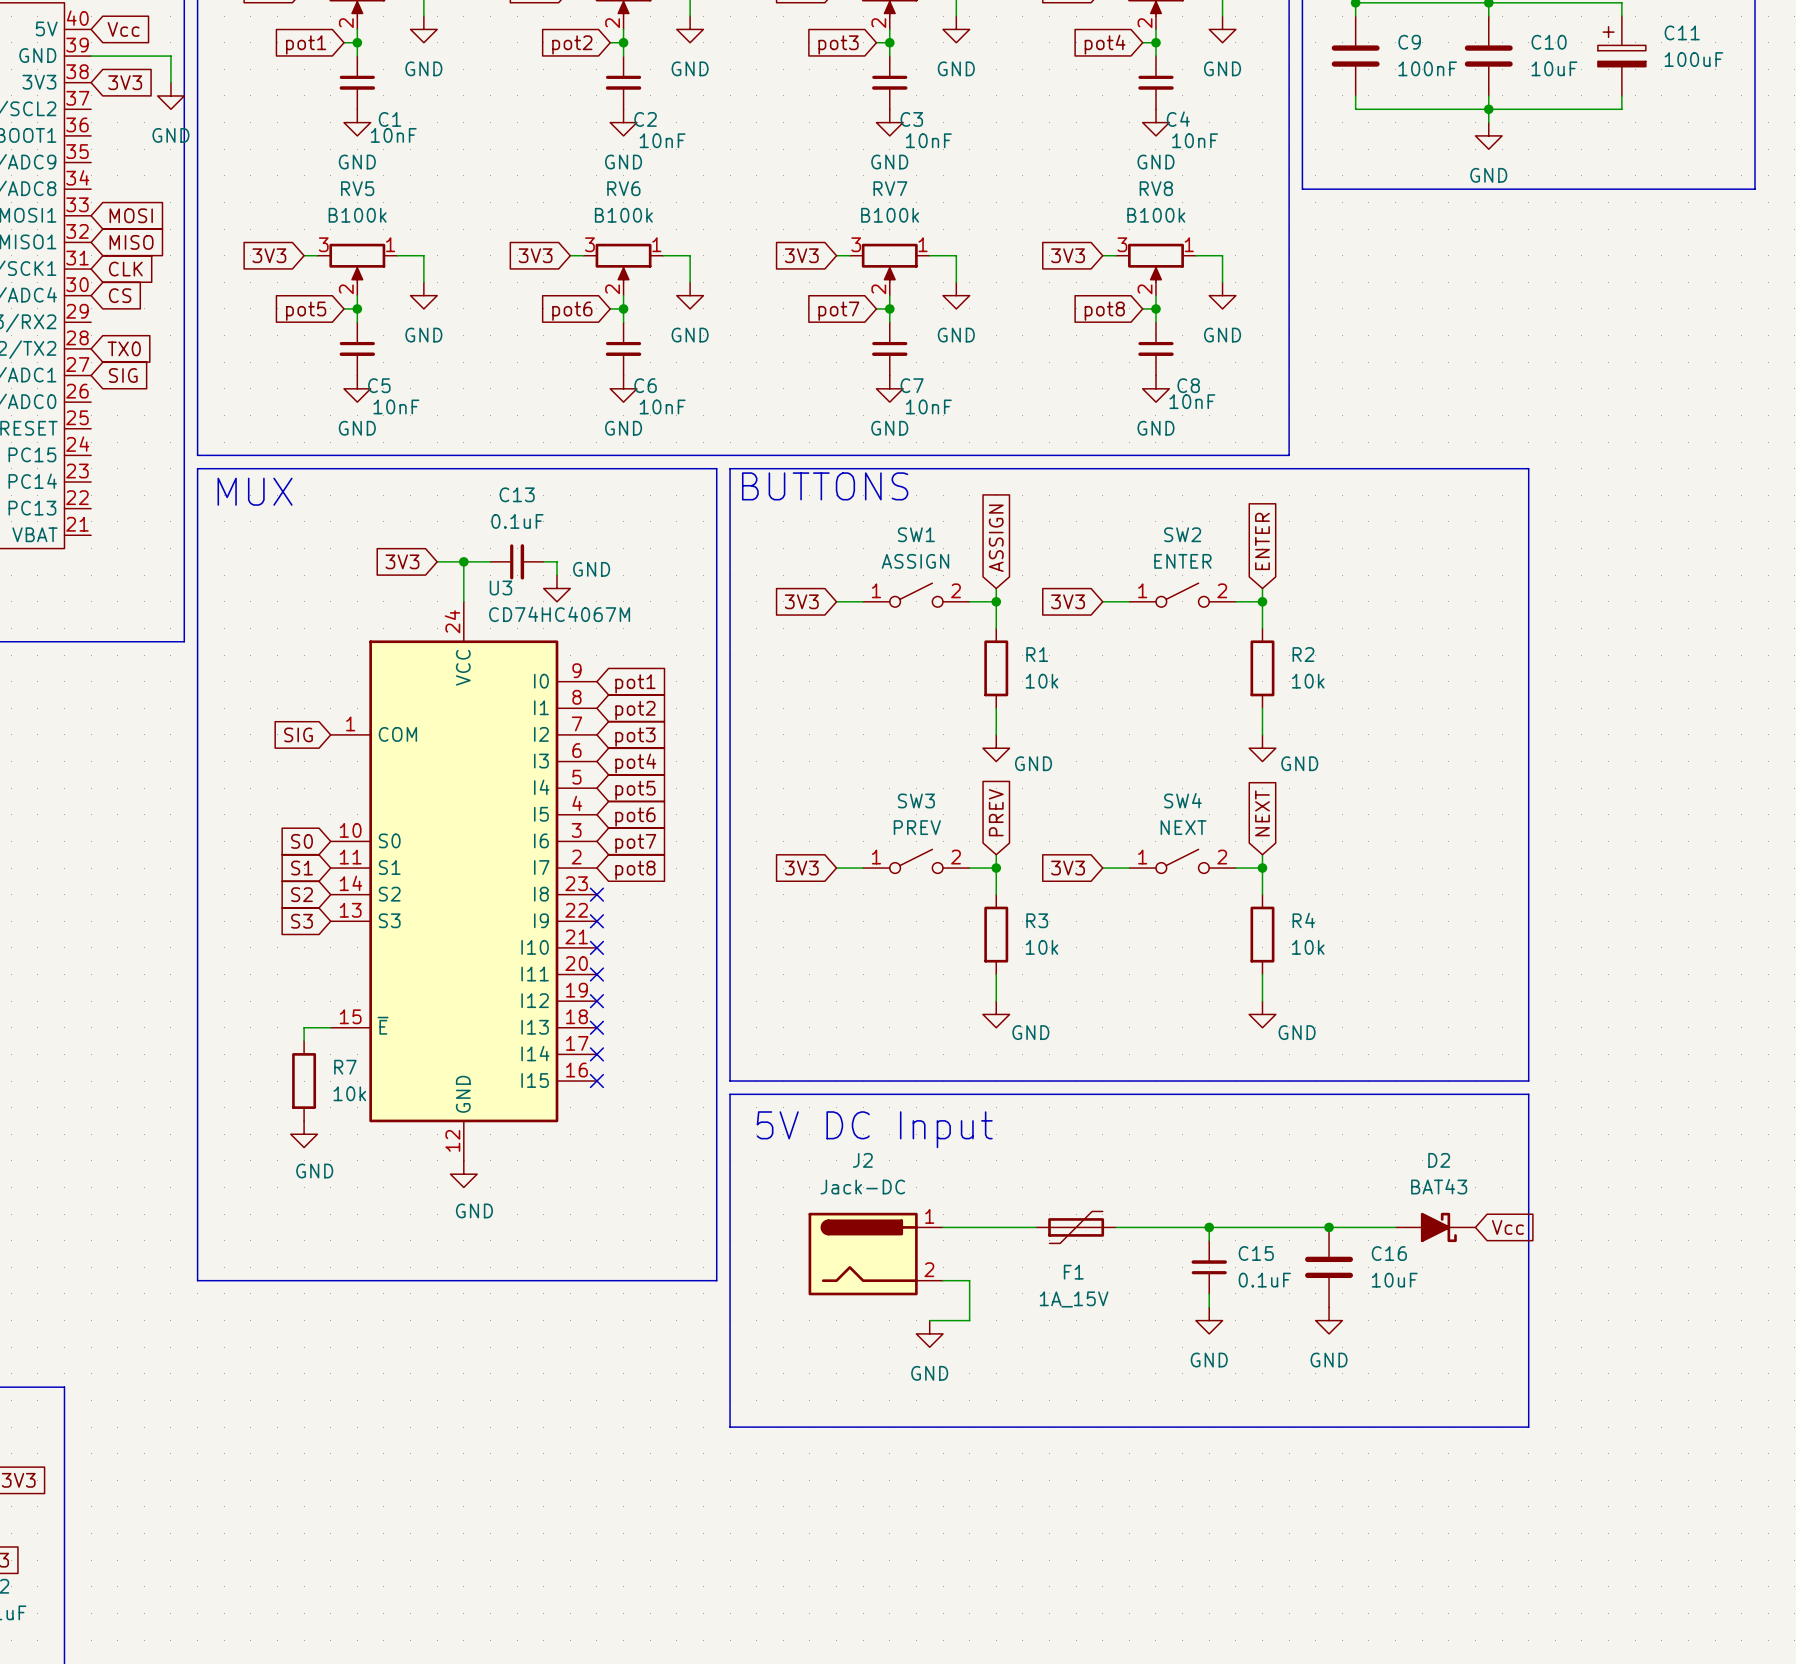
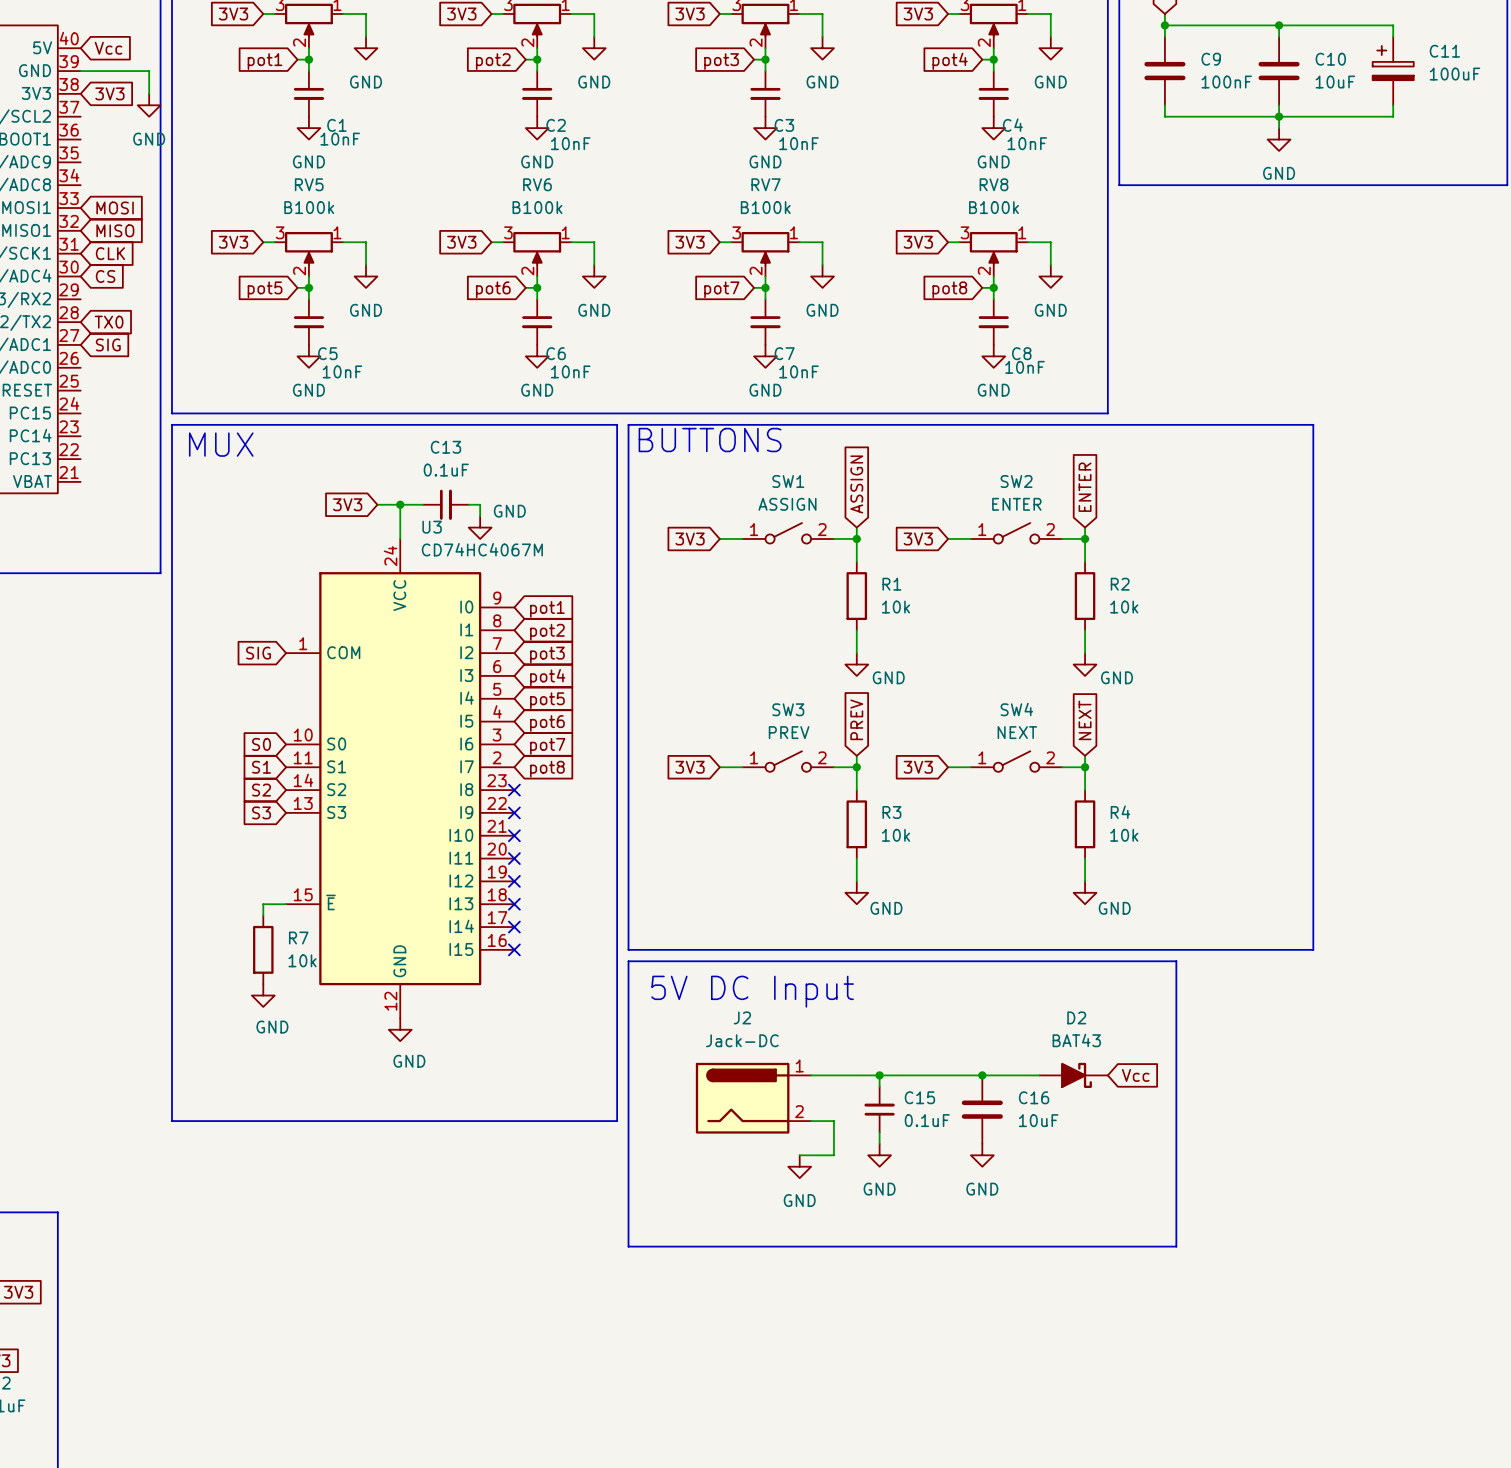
line: (1368, 1094) (1528, 1094) (1528, 1427) (1368, 1427) -> (1176, 961) (1176, 1246)
wire: none -> (879, 1075) (879, 1086)
junction: none -> (879, 1075)
F1: 1A_15V (1076, 1227) -> none
junction: none -> (982, 1075)
junction: (1209, 1227) -> none
junction: (1329, 1227) -> none
wire: (1395, 1227) (1209, 1227) (1209, 1240) -> none
D2 position: (1435, 1227) -> (1073, 1075)
global label position: Vcc (1507, 1227) -> Vcc (1135, 1075)
C15 position: (1209, 1267) -> (879, 1109)
C16 position: (1329, 1267) -> (982, 1109)
wire: (1209, 1293) (1209, 1307) -> (879, 1132) (879, 1143)
power symbol: none -> GND (879, 1155)
power symbol position: GND (1209, 1320) -> GND (982, 1155)
power symbol: GND (1329, 1320) -> none

